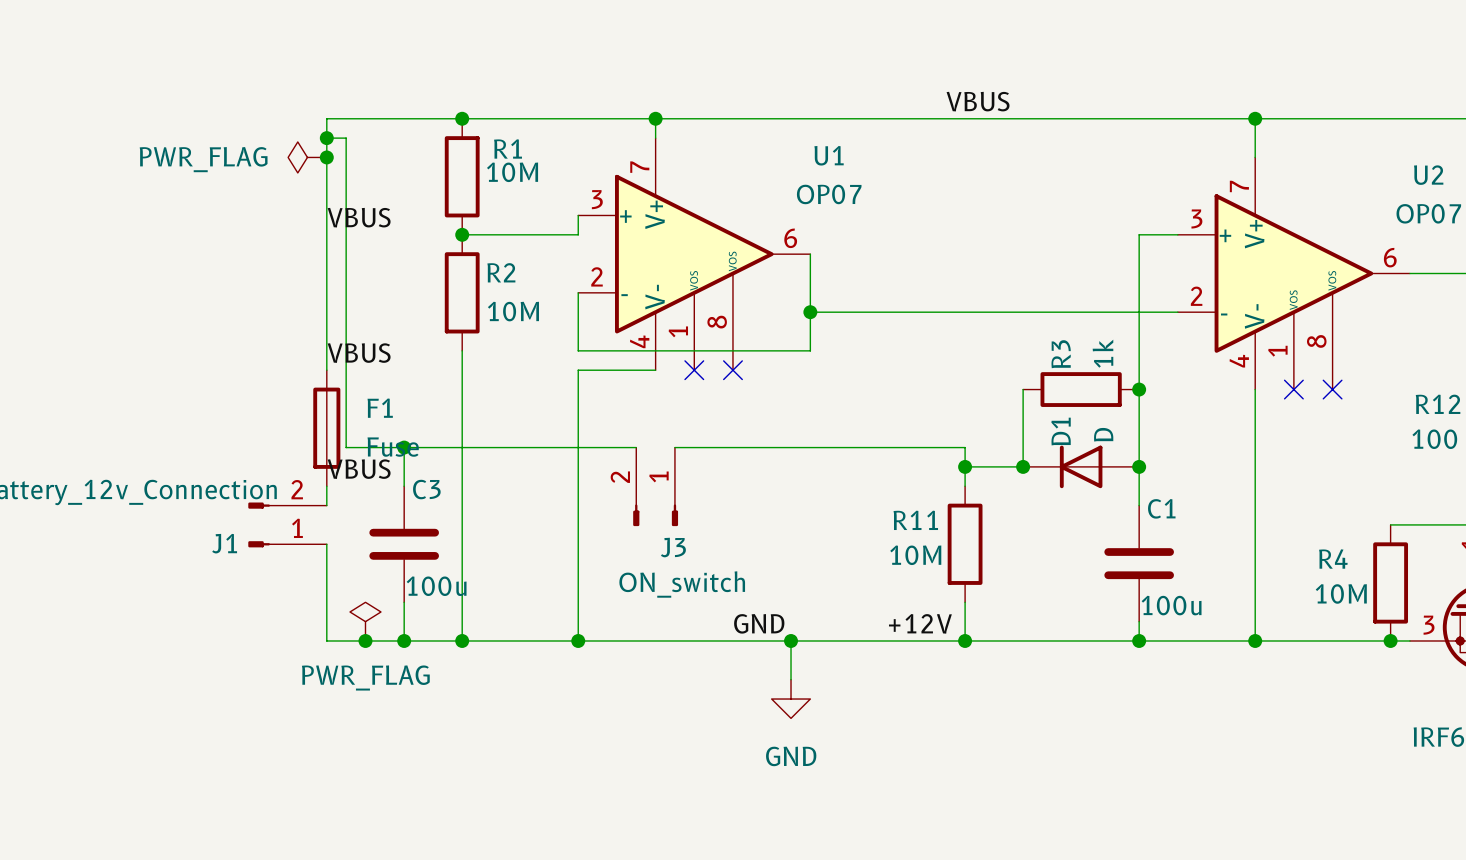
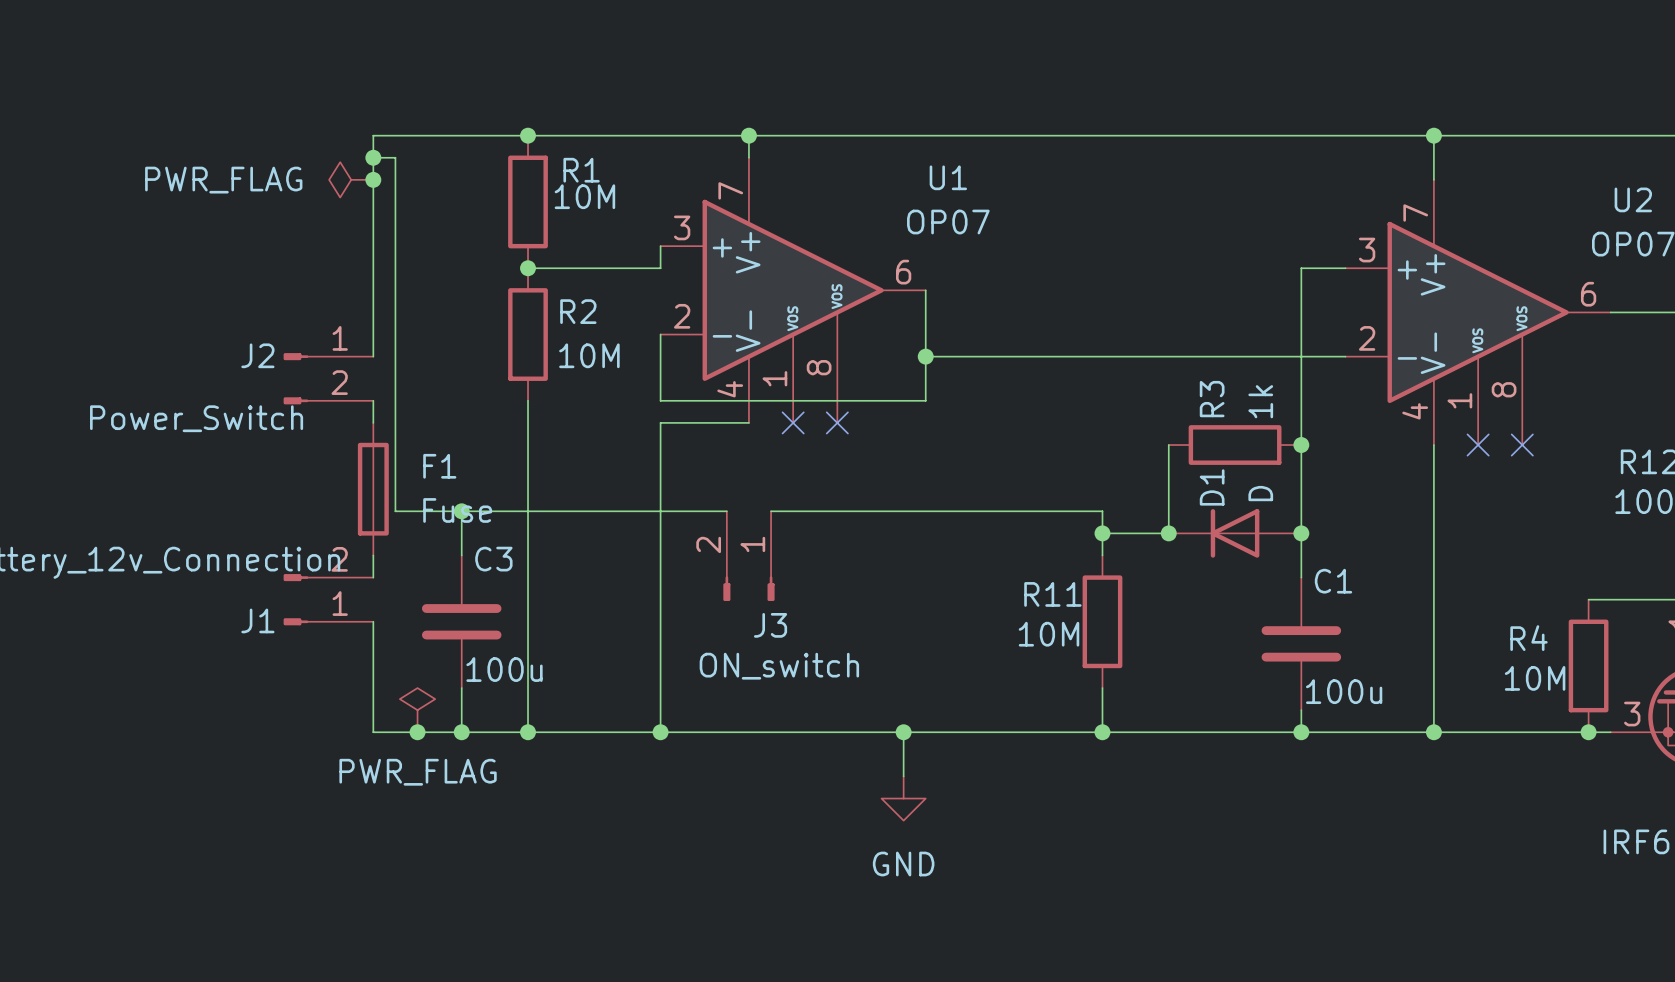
label: VBUS (978, 101) -> none
label: VBUS (359, 217) -> none
wire: (326, 312) (326, 350) -> none
J2: none -> Power_Switch (328, 378)
label: VBUS (359, 353) -> none
label: VBUS (359, 469) -> none
label: GND (759, 623) -> none
label: +12V (920, 623) -> none

